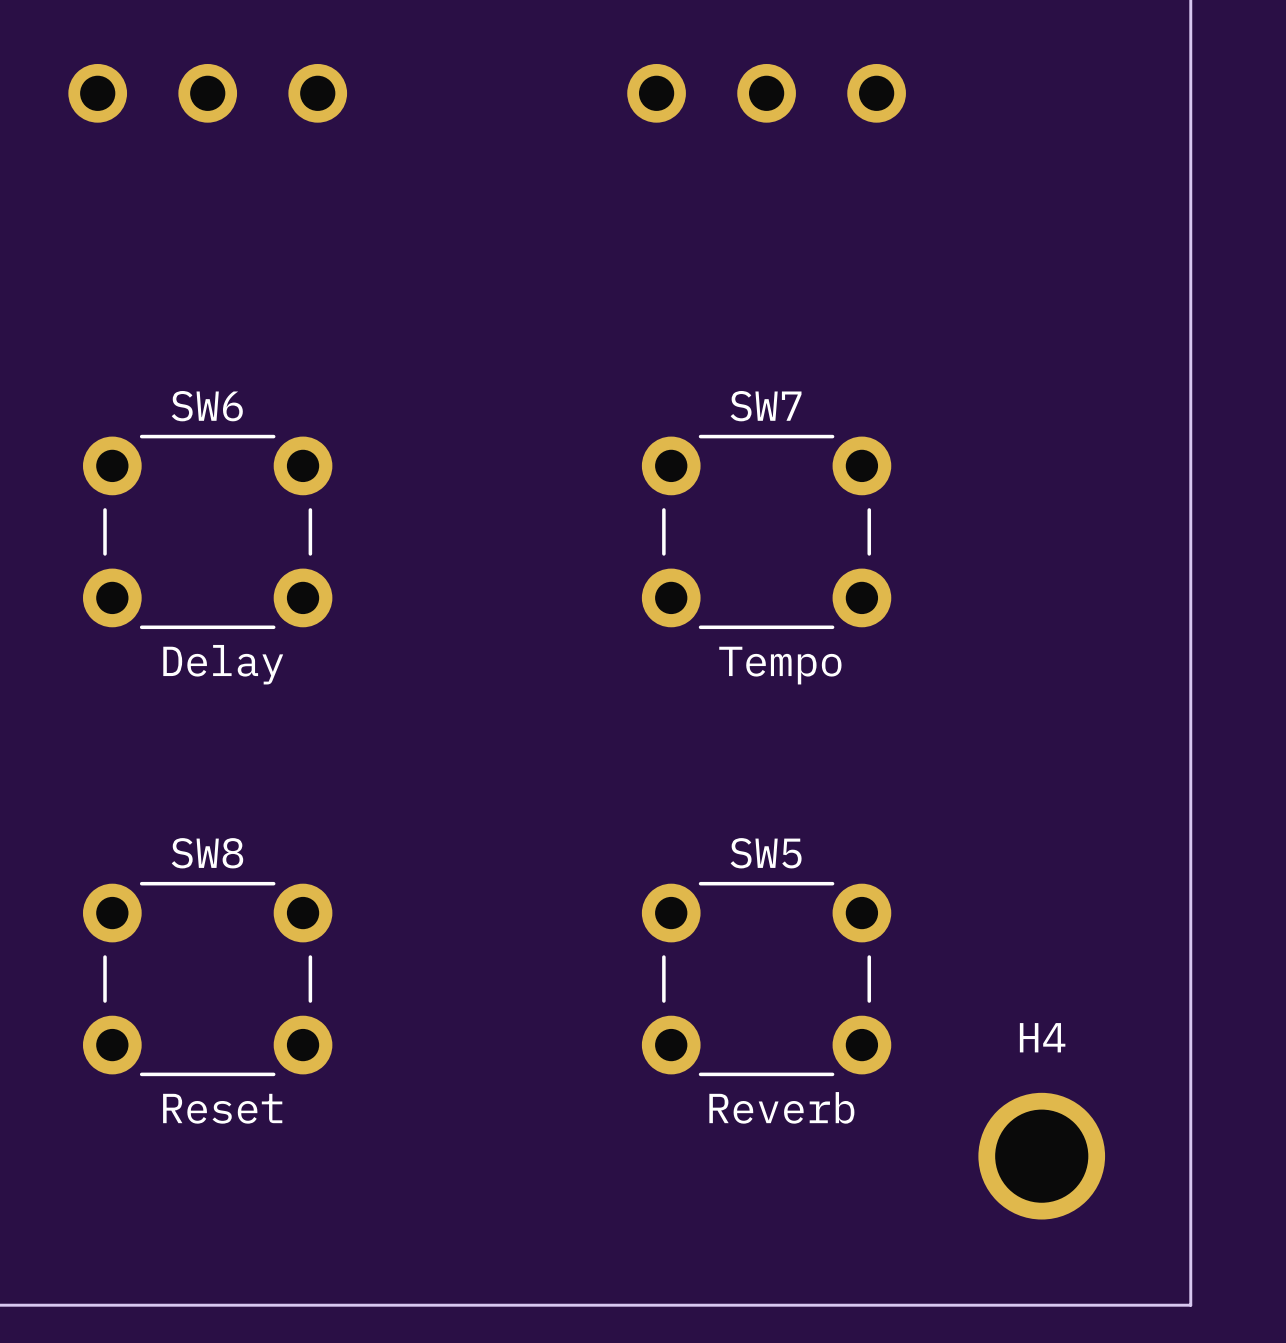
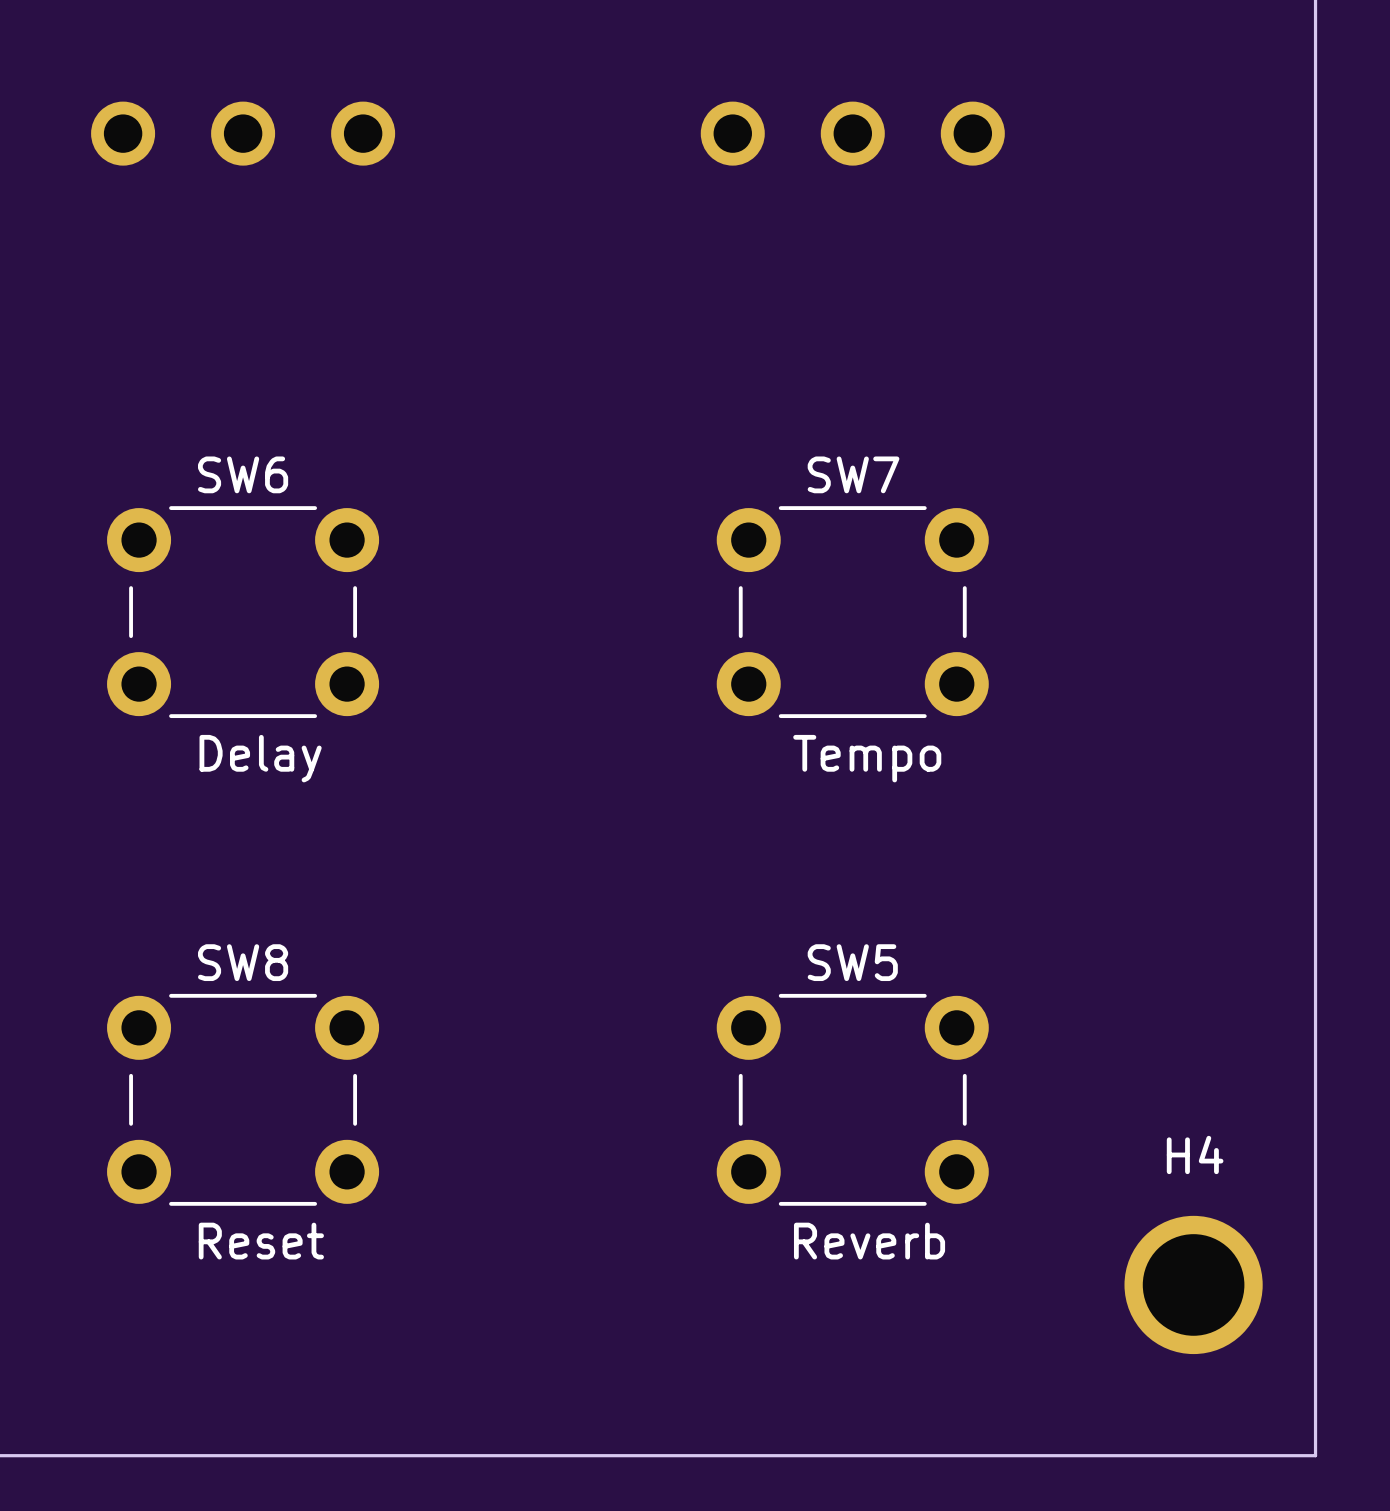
H4 position: (1041, 1156) -> (1193, 1284)

